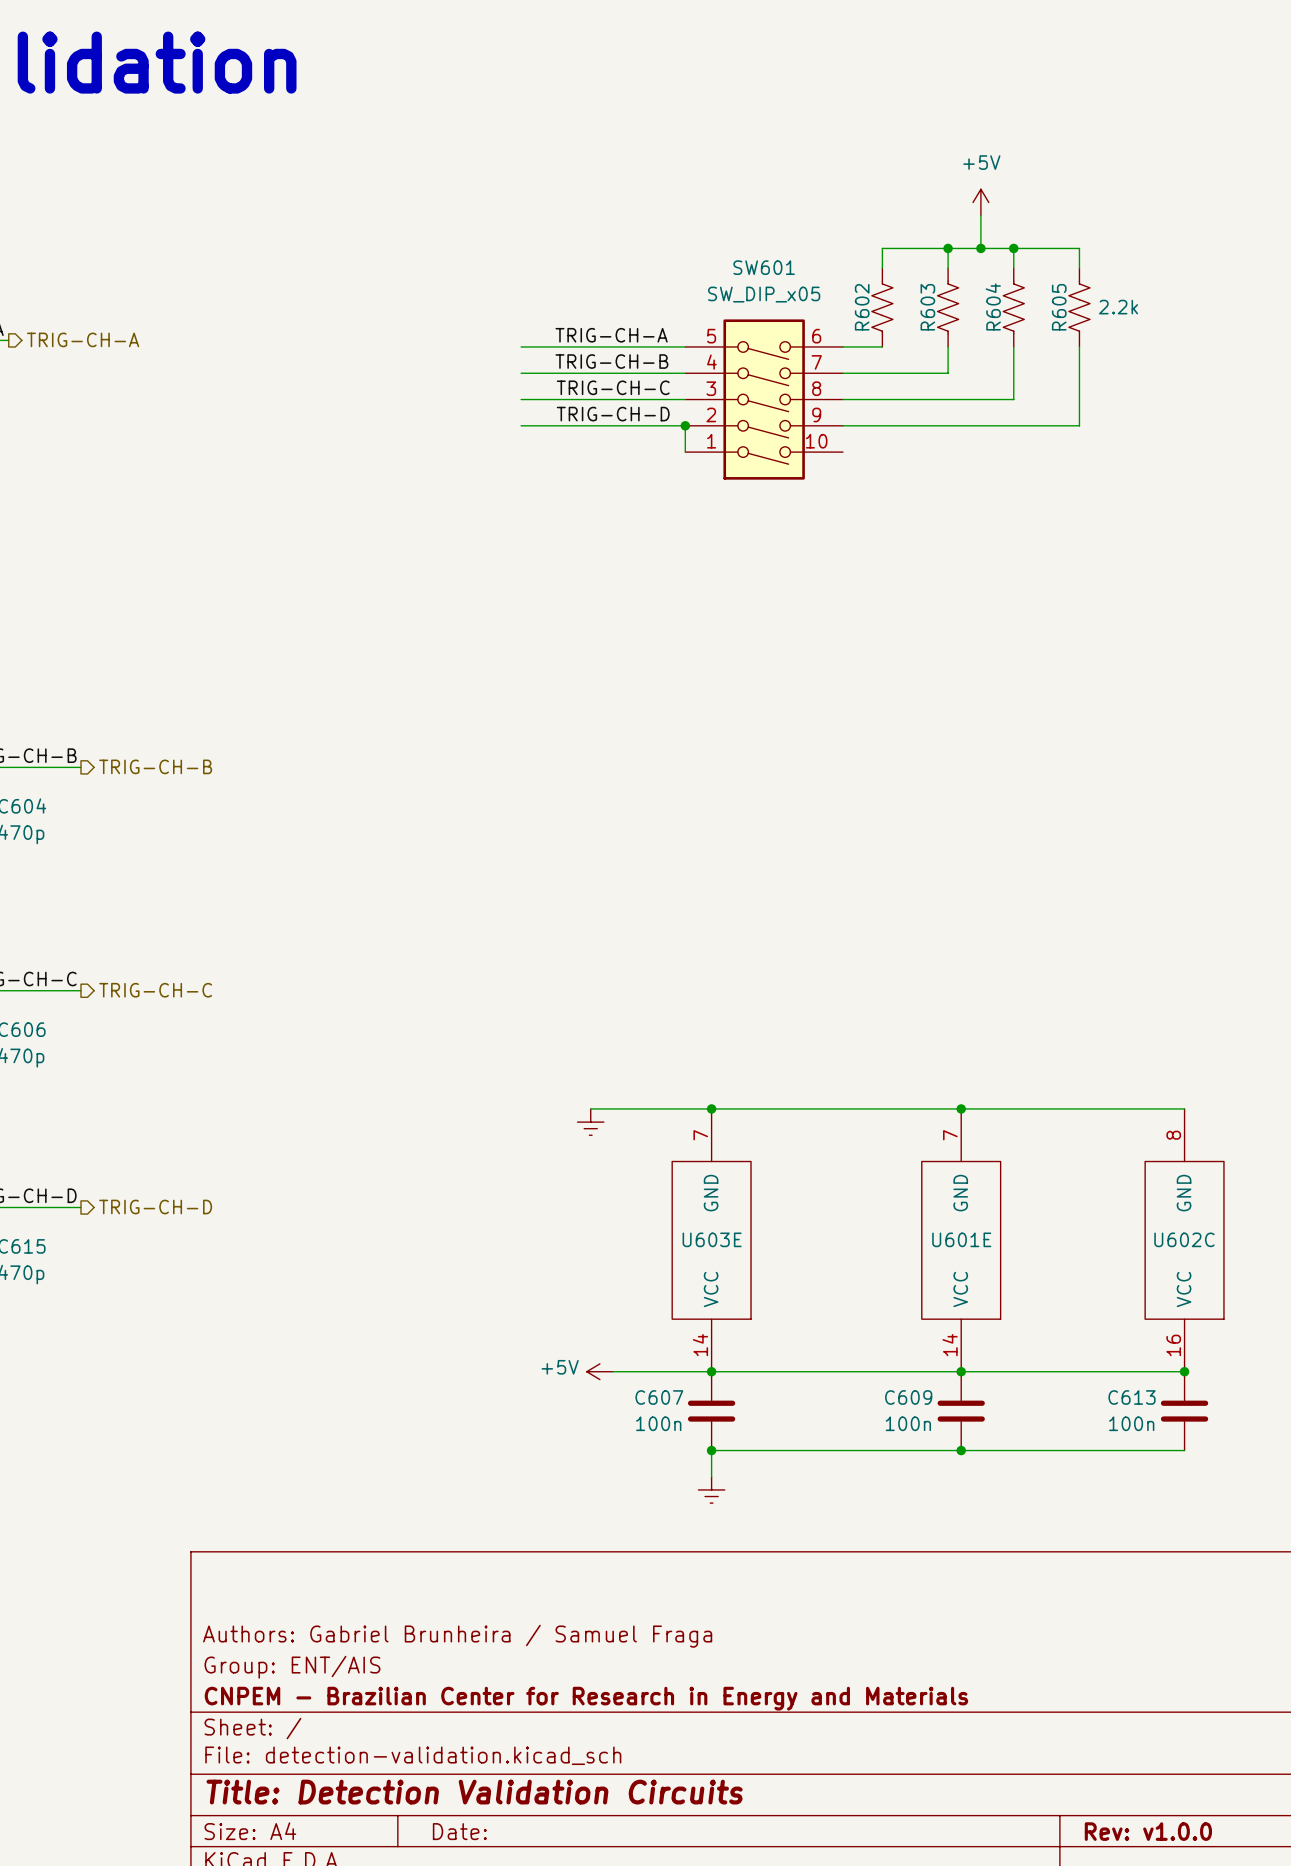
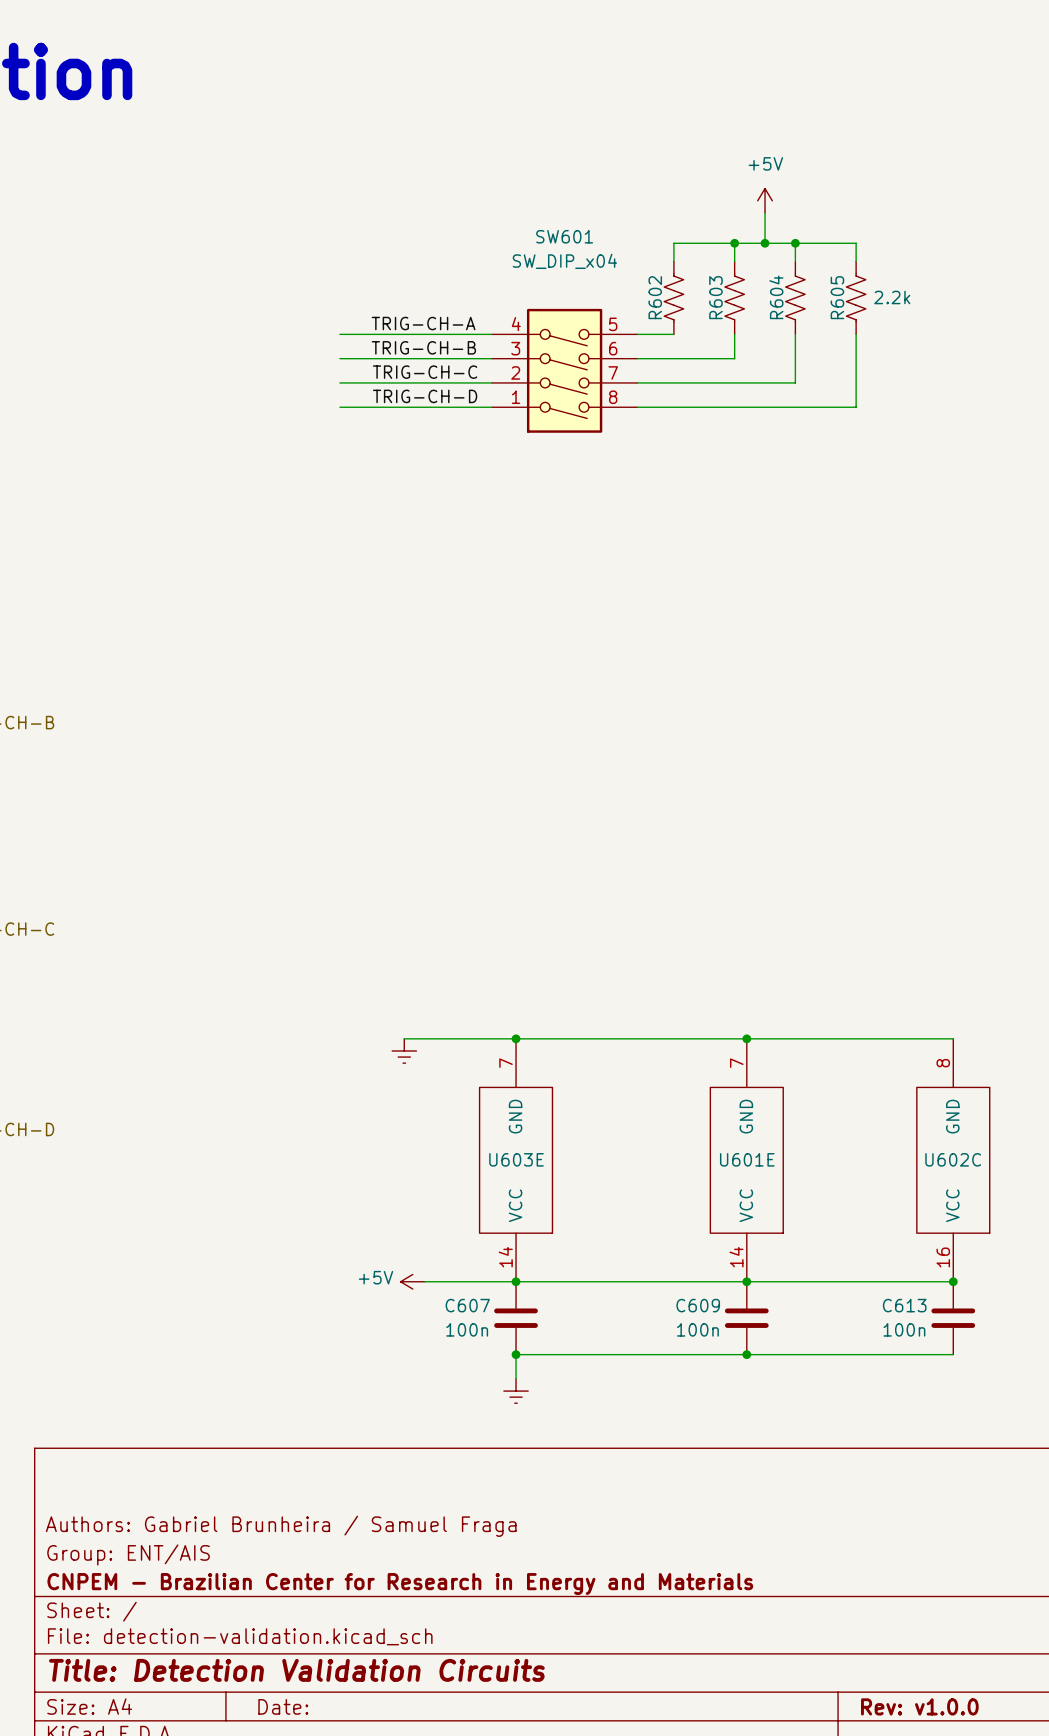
SW601 value: SW_DIP_x05 (764, 294) -> SW_DIP_x04 (564, 261)
SW601 symbol: [685, 319, 843, 480] -> [491, 308, 638, 433]
wire: (685, 425) (685, 452) -> none
junction: (685, 425) -> none

